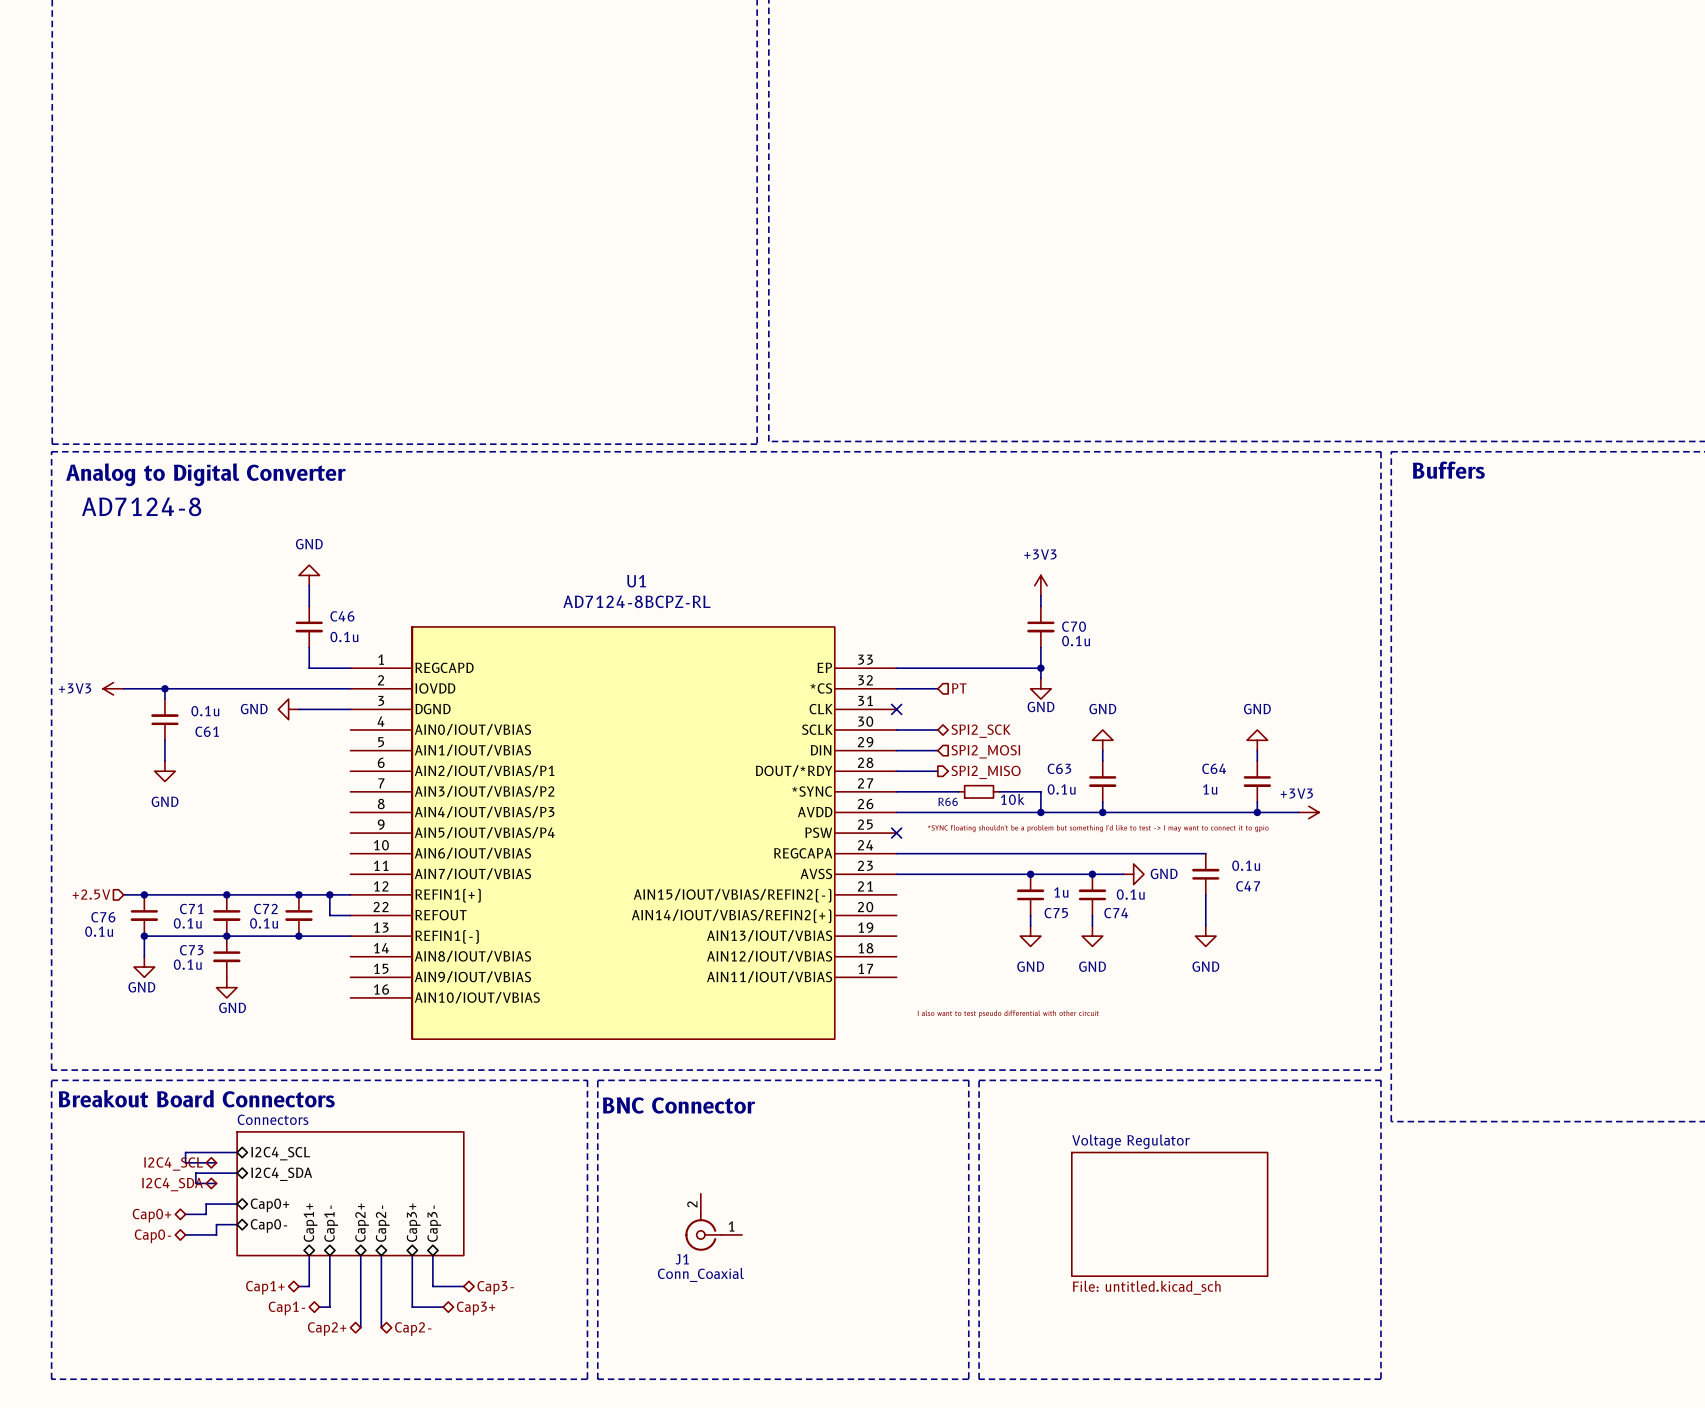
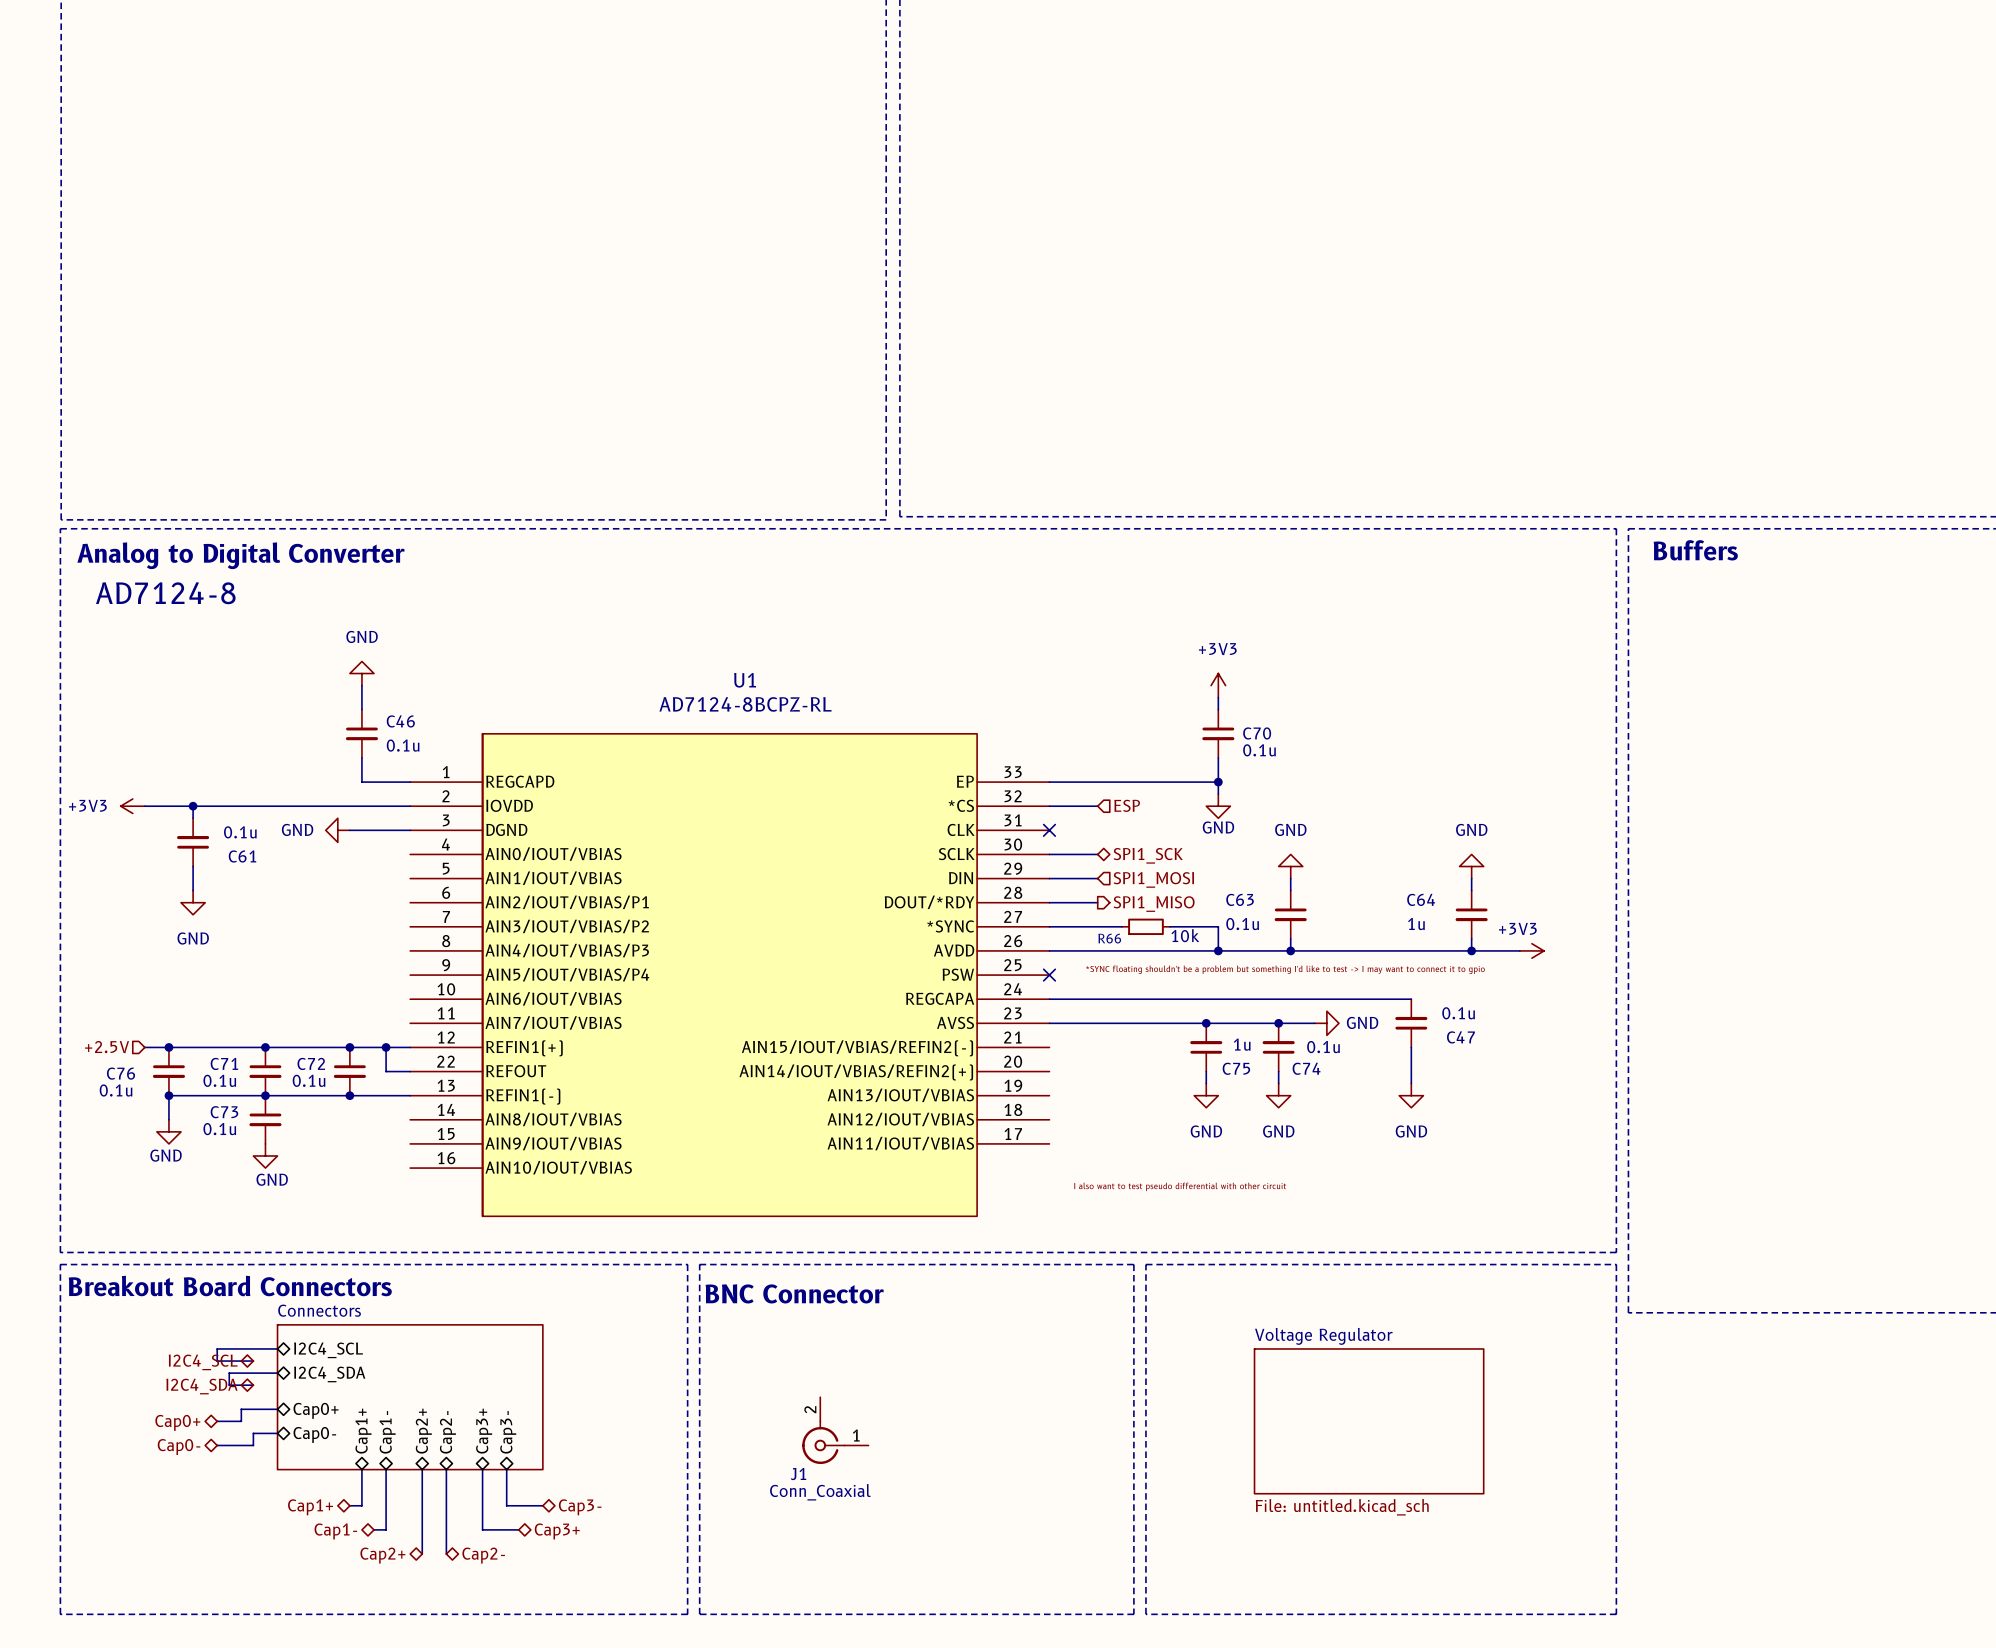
hierarchical label: PT (959, 688) -> ESP (1127, 805)
hierarchical label: SPI2_SCK (981, 731) -> SPI1_SCK (1148, 855)
hierarchical label: SPI2_MOSI (985, 751) -> SPI1_MOSI (1153, 879)
hierarchical label: SPI2_MISO (986, 772) -> SPI1_MISO (1154, 904)

